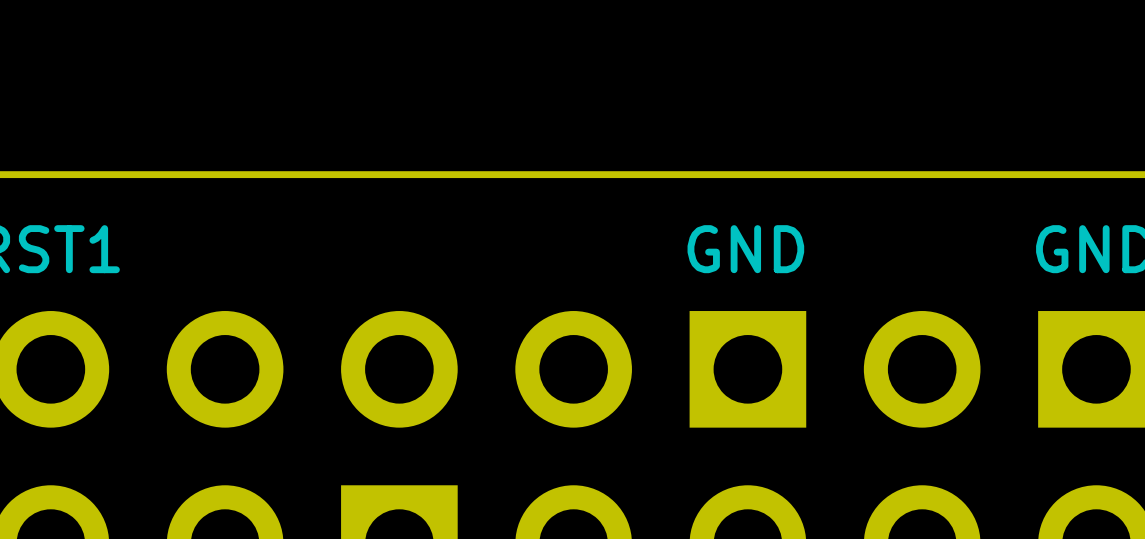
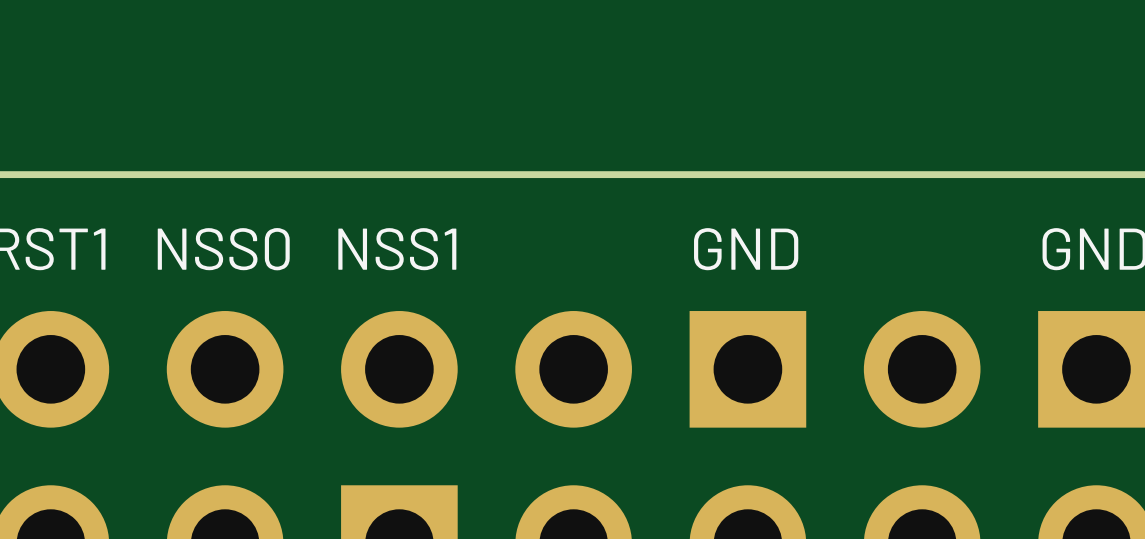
part text: none -> NSS0 (223, 249)
part text: none -> NSS1 (397, 249)

